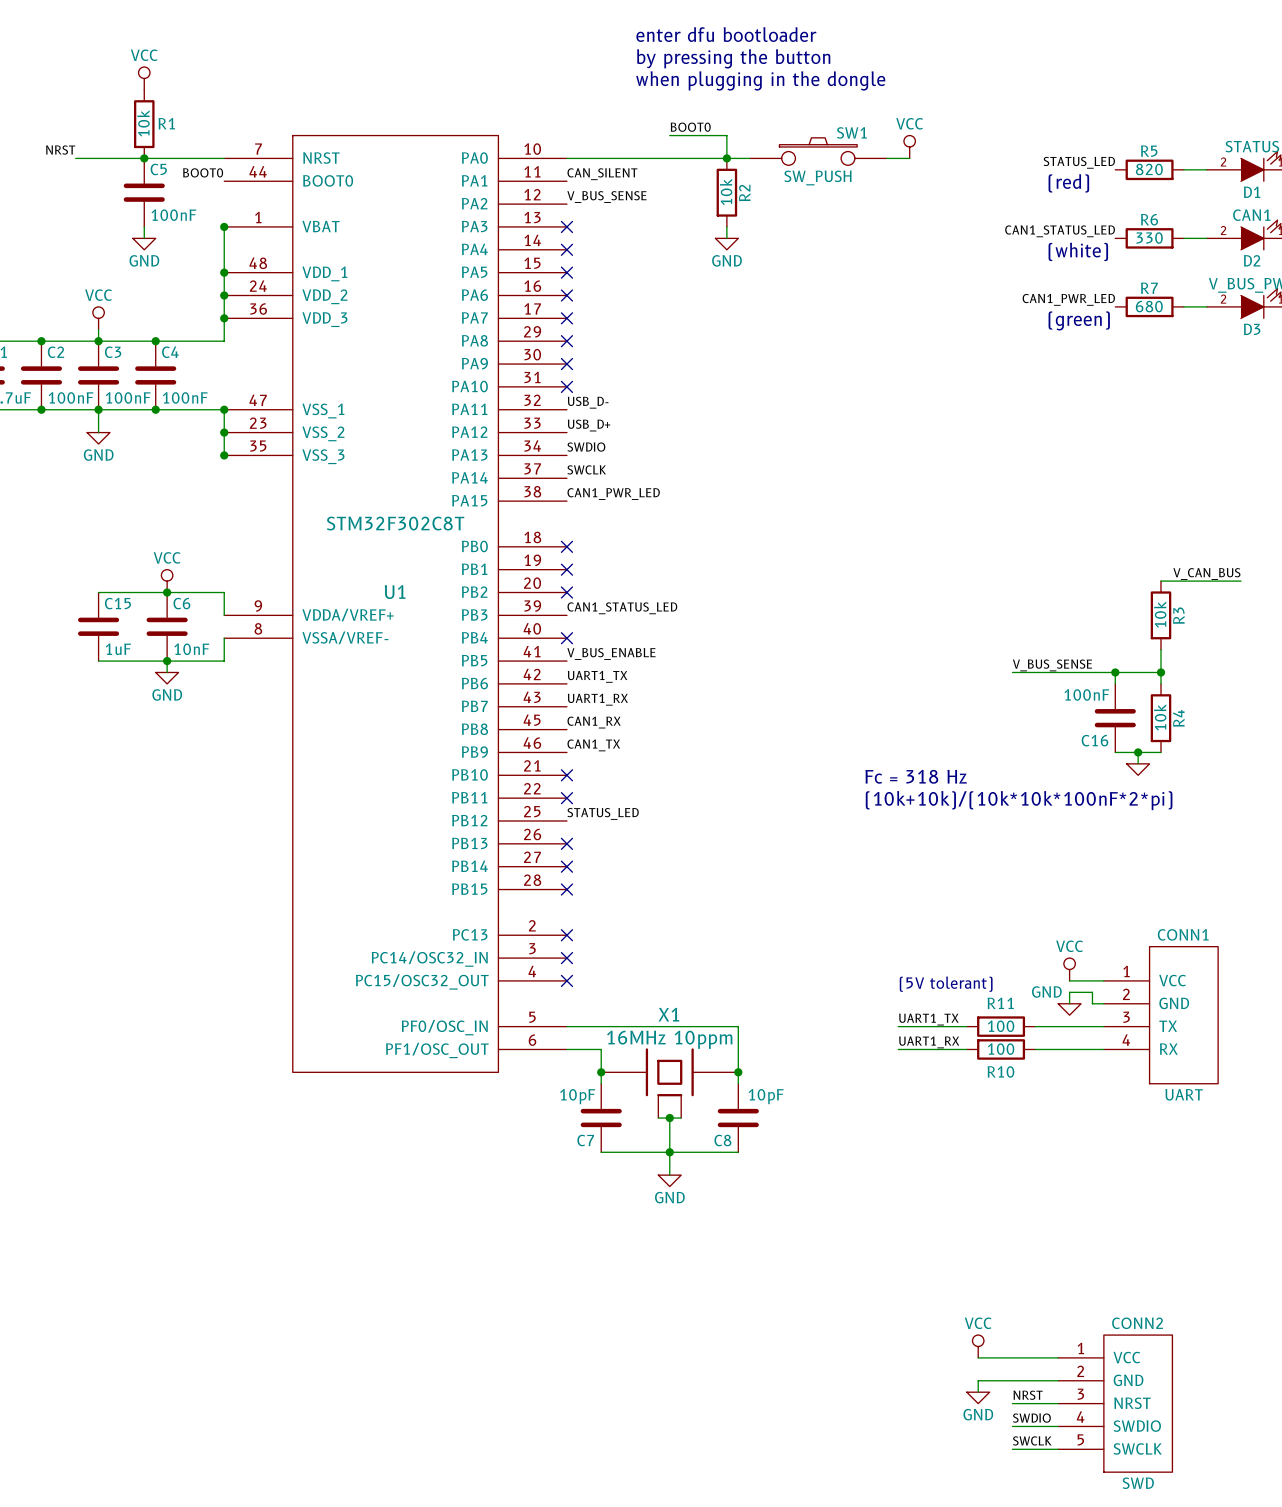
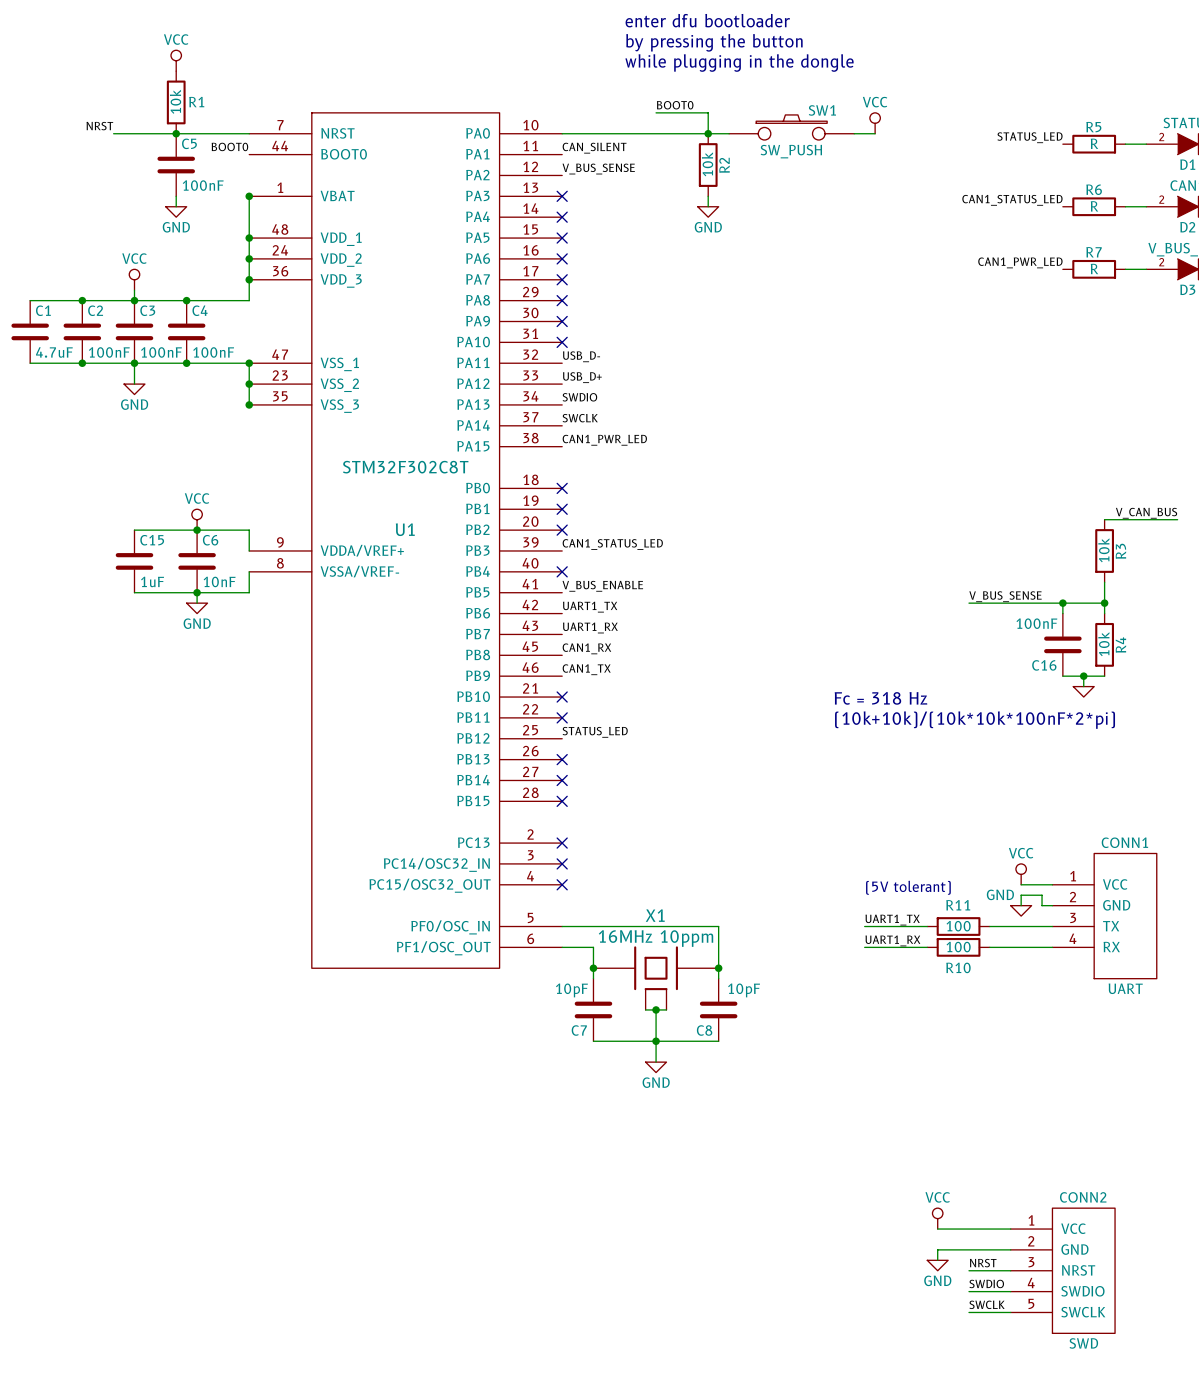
text: when plugging in the dongle (760, 80) -> while plugging in the dongle (739, 63)
R5 value: 820 (1149, 169) -> R (1094, 143)
text: (red) (1068, 183) -> none
R6 value: 330 (1149, 238) -> R (1094, 206)
text: (white) (1078, 251) -> none
R7 value: 680 (1149, 306) -> R (1094, 268)
text: (green) (1079, 320) -> none

